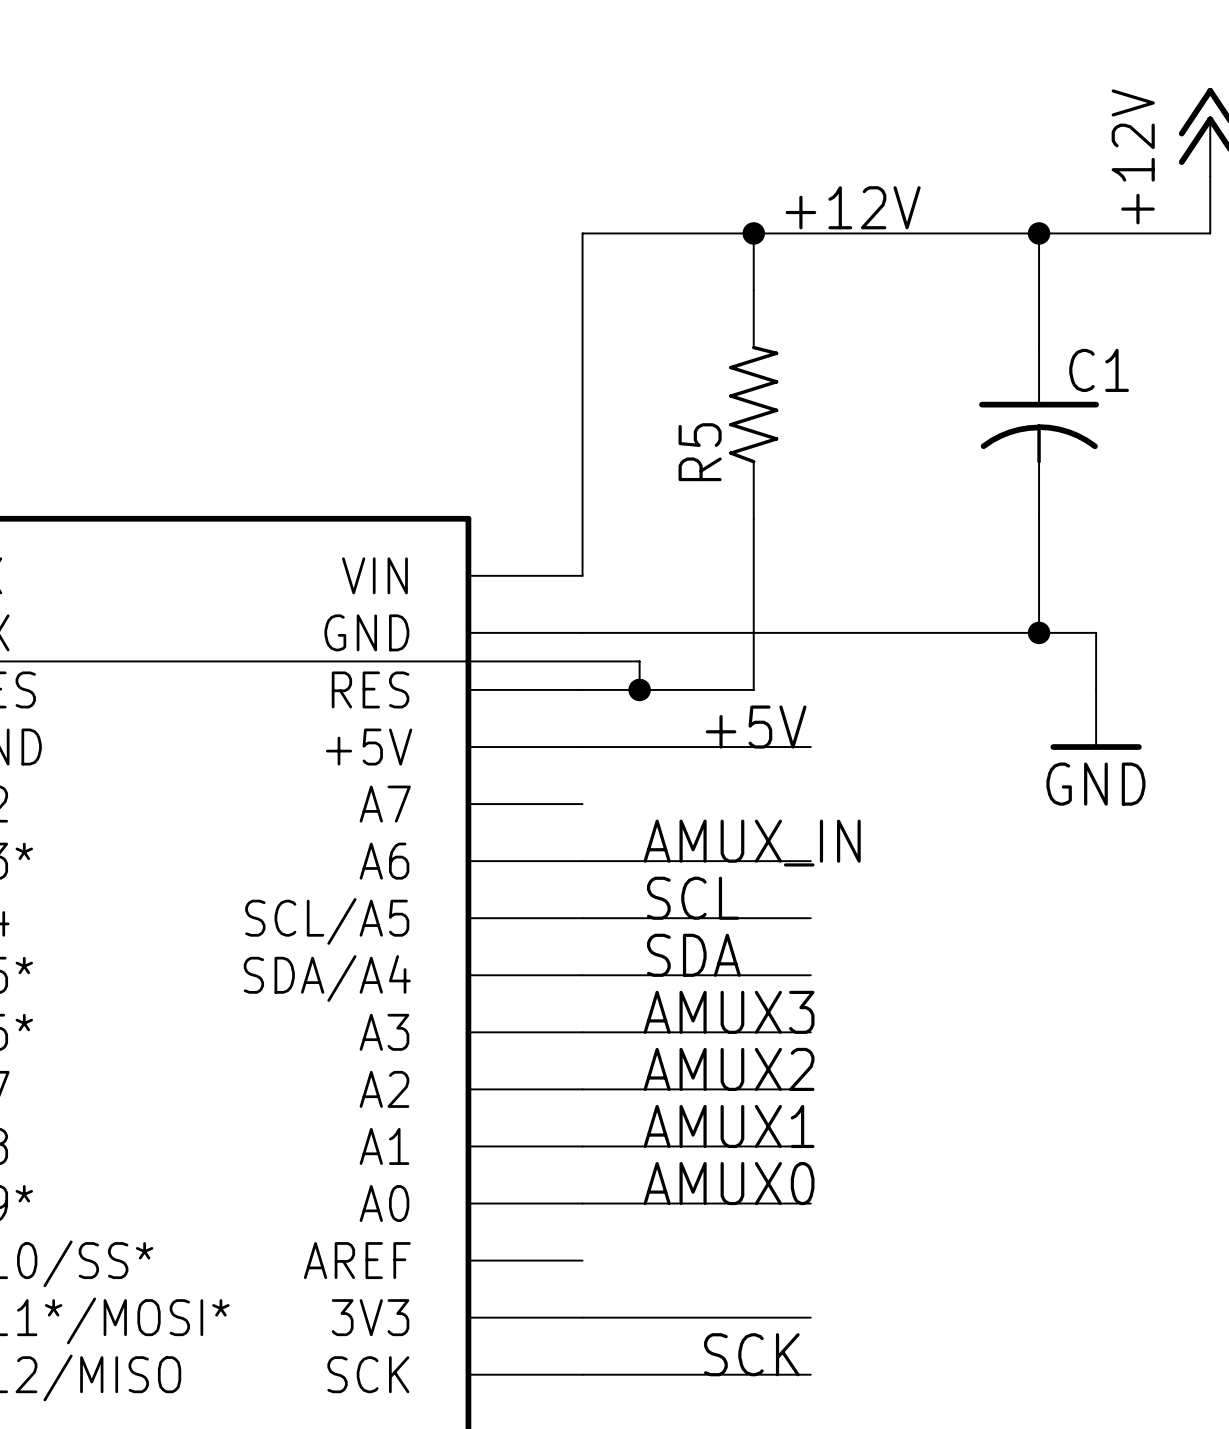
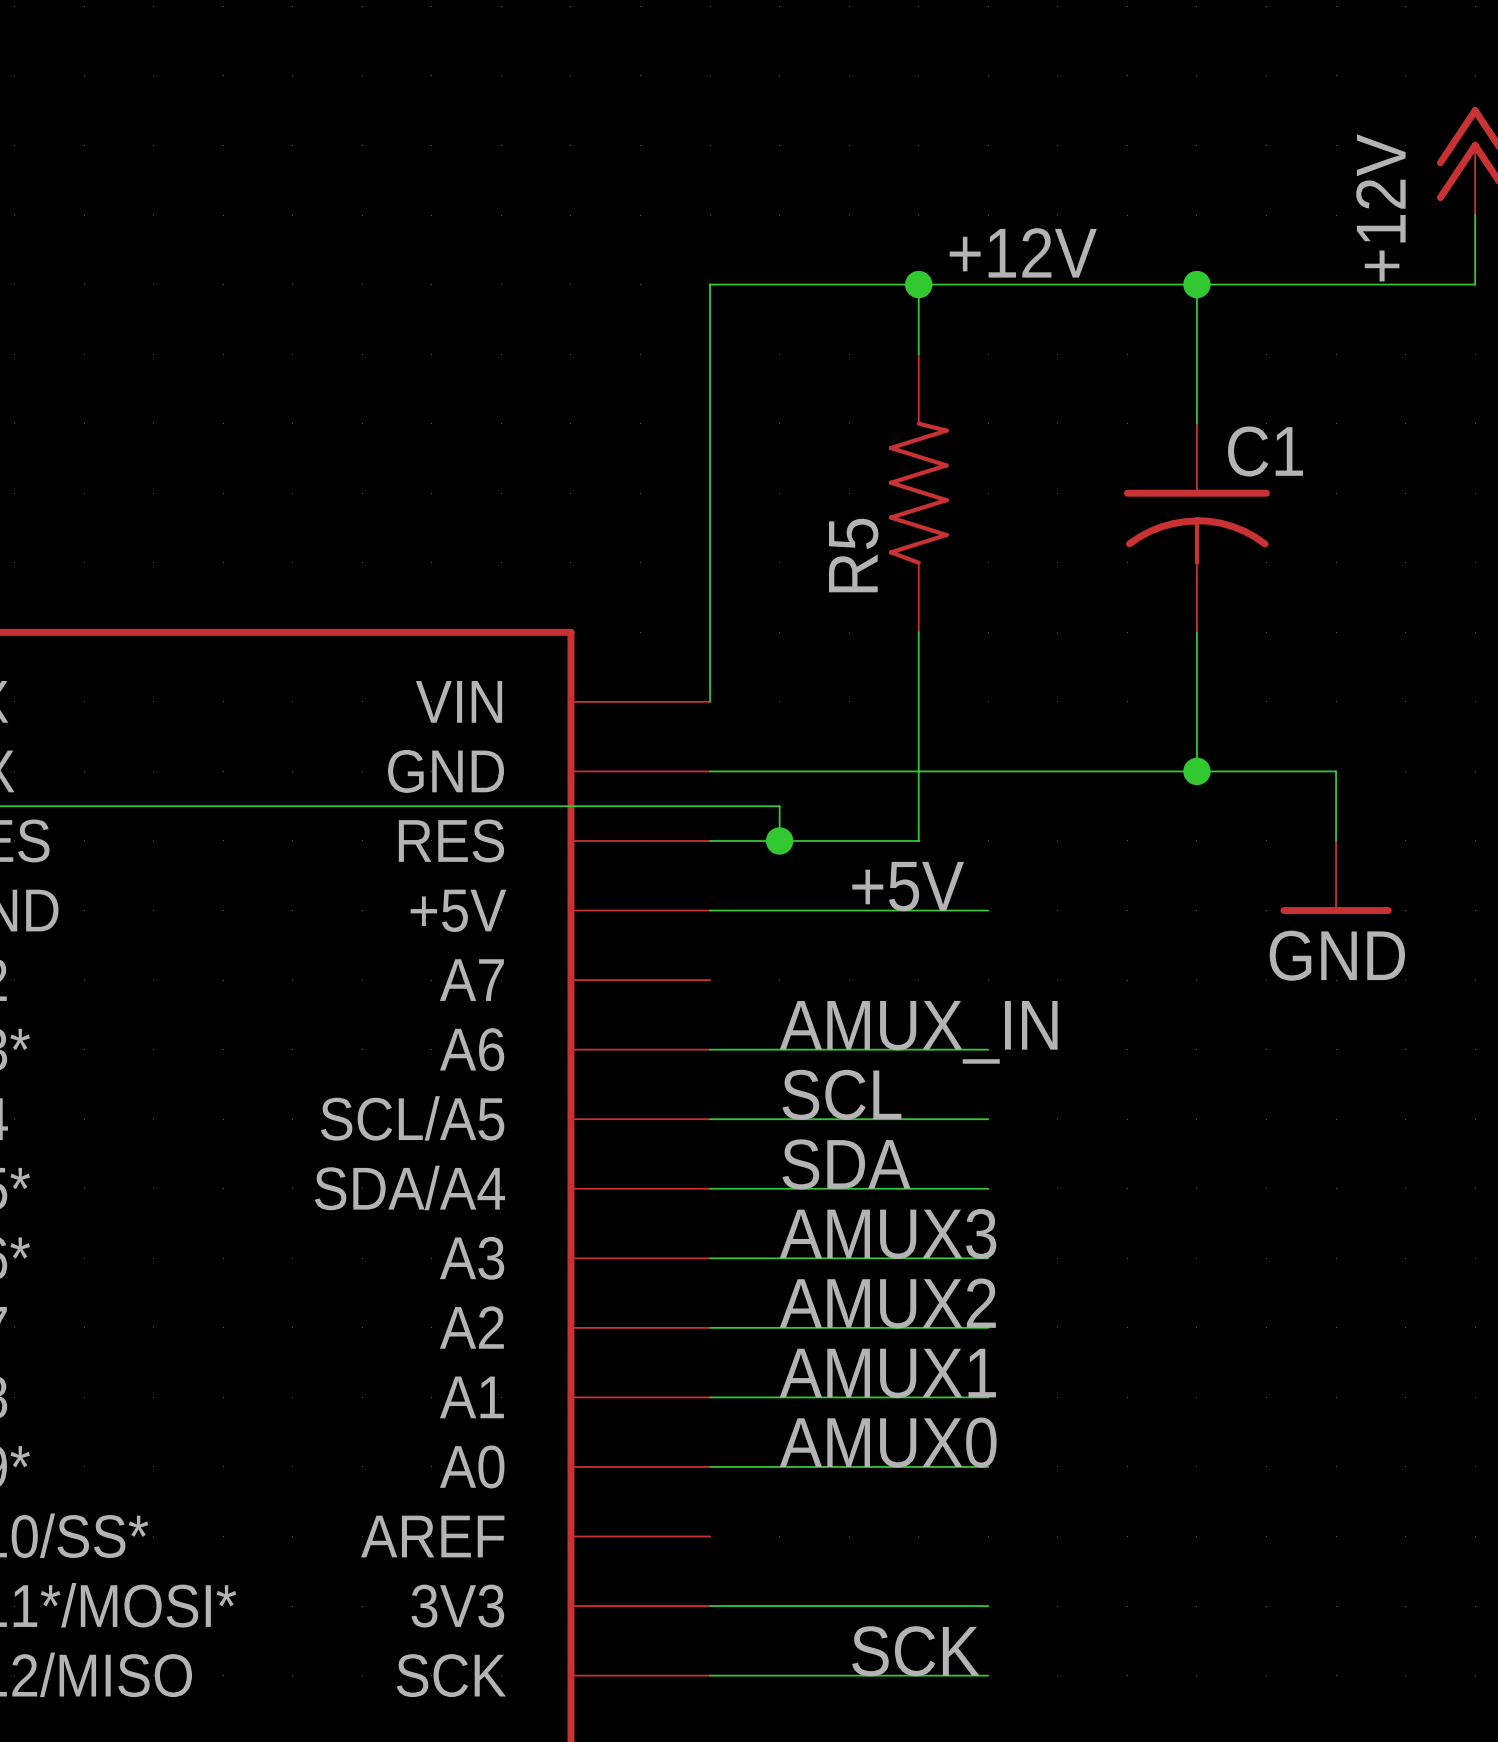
wire: (1039, 233) (1039, 347) -> (1196, 284) (1196, 423)
junction position: (1039, 233) -> (1196, 284)
C1 position: (1039, 433) -> (1196, 527)
wire: (1039, 518) (1039, 632) -> (1196, 632) (1196, 771)
junction position: (1039, 632) -> (1196, 771)

